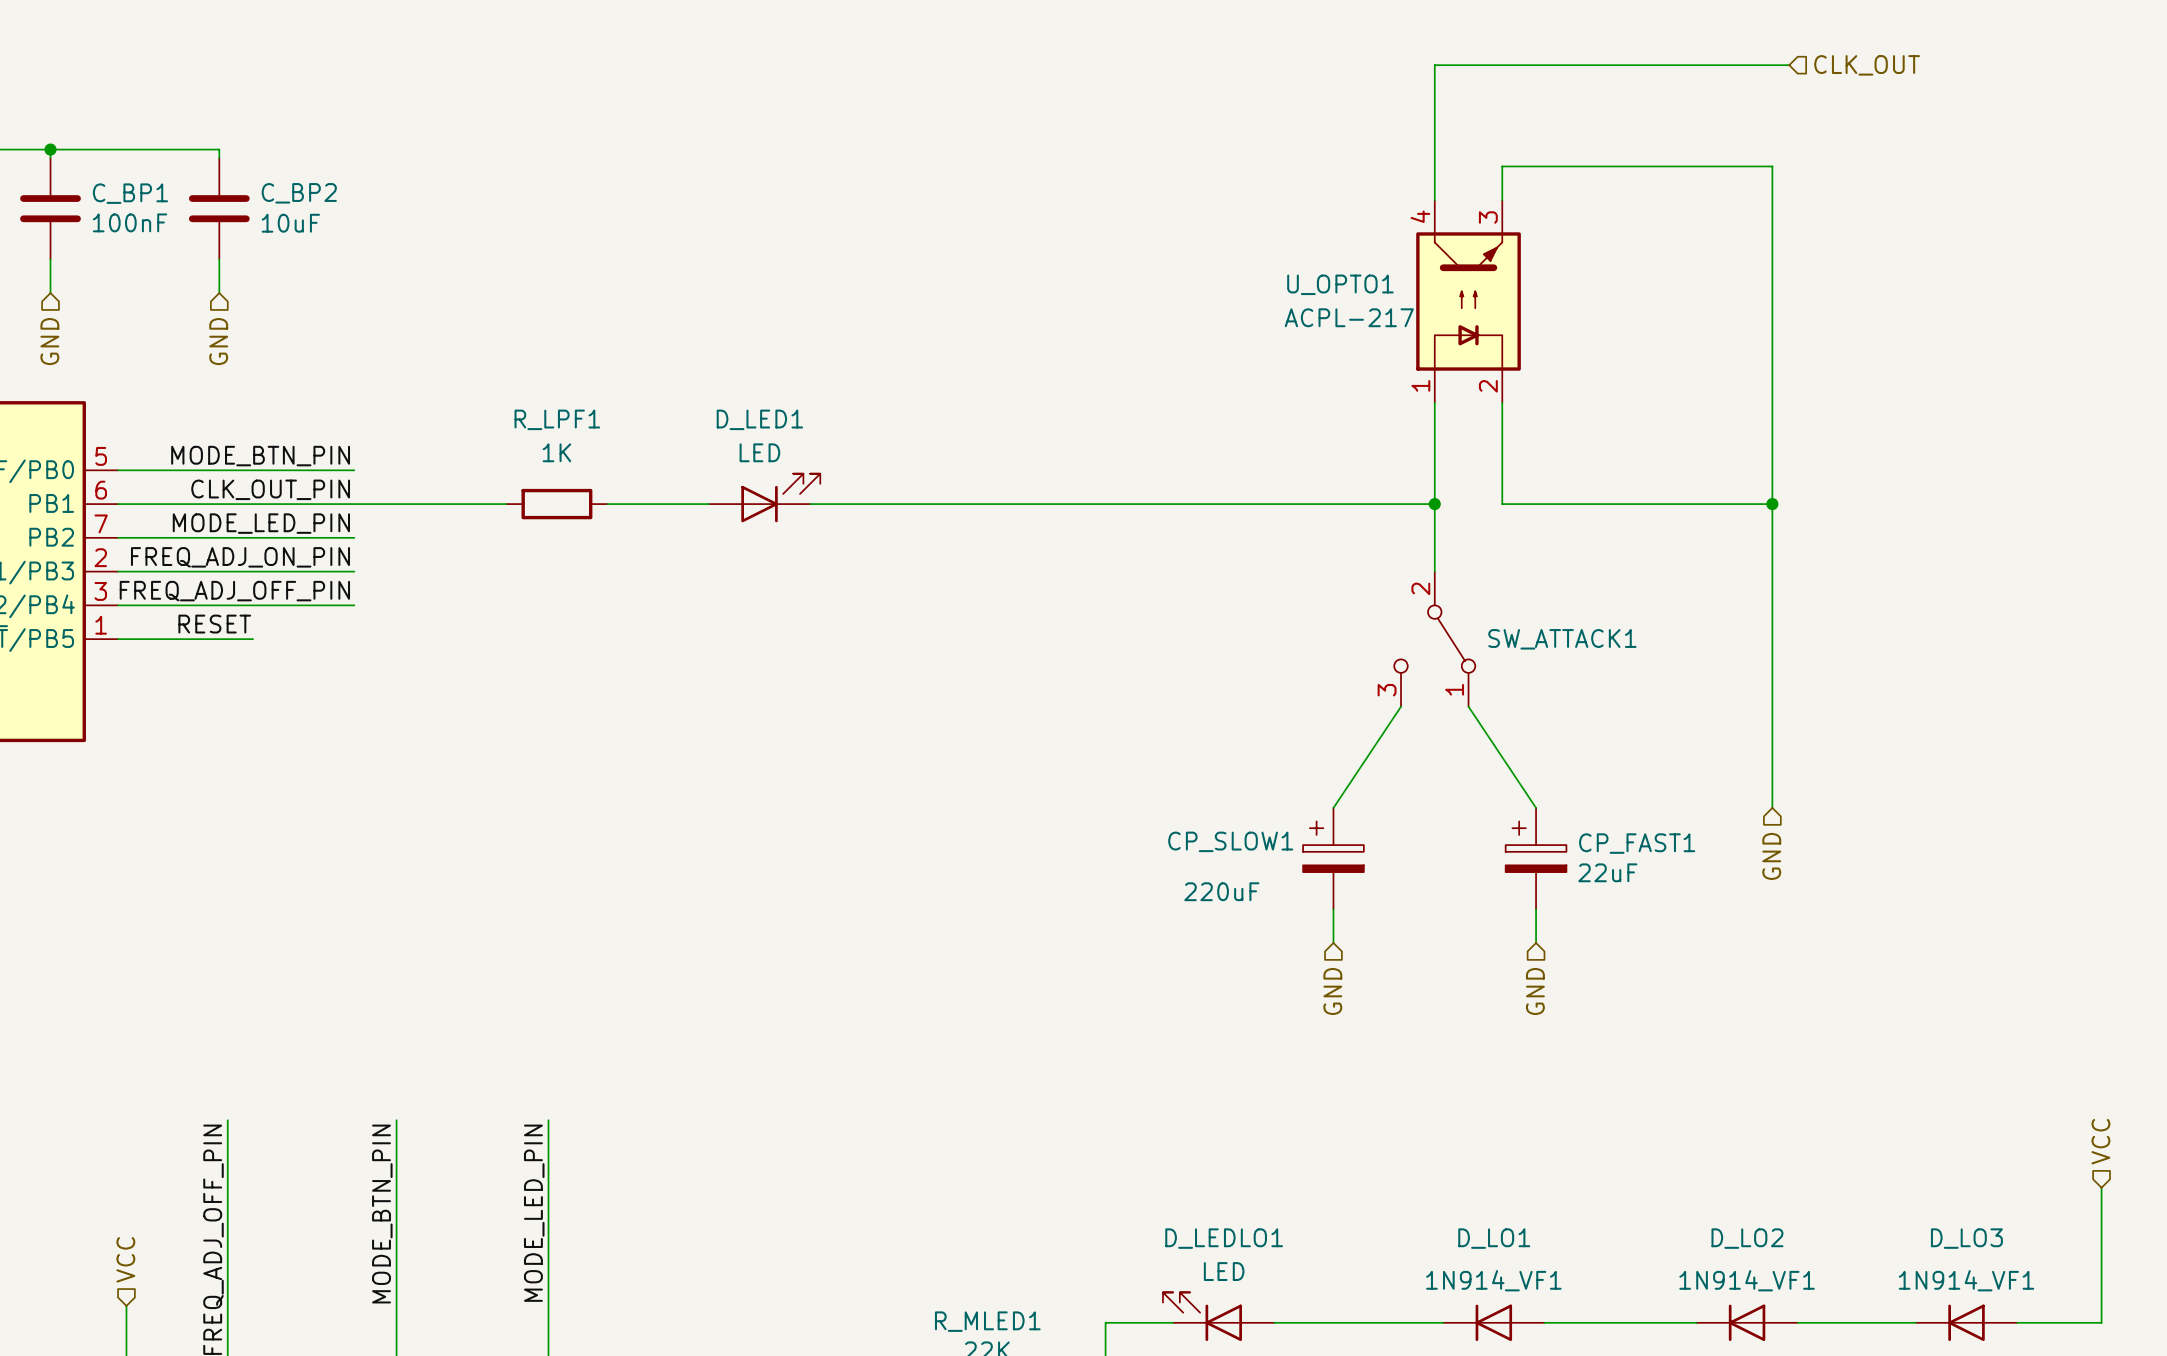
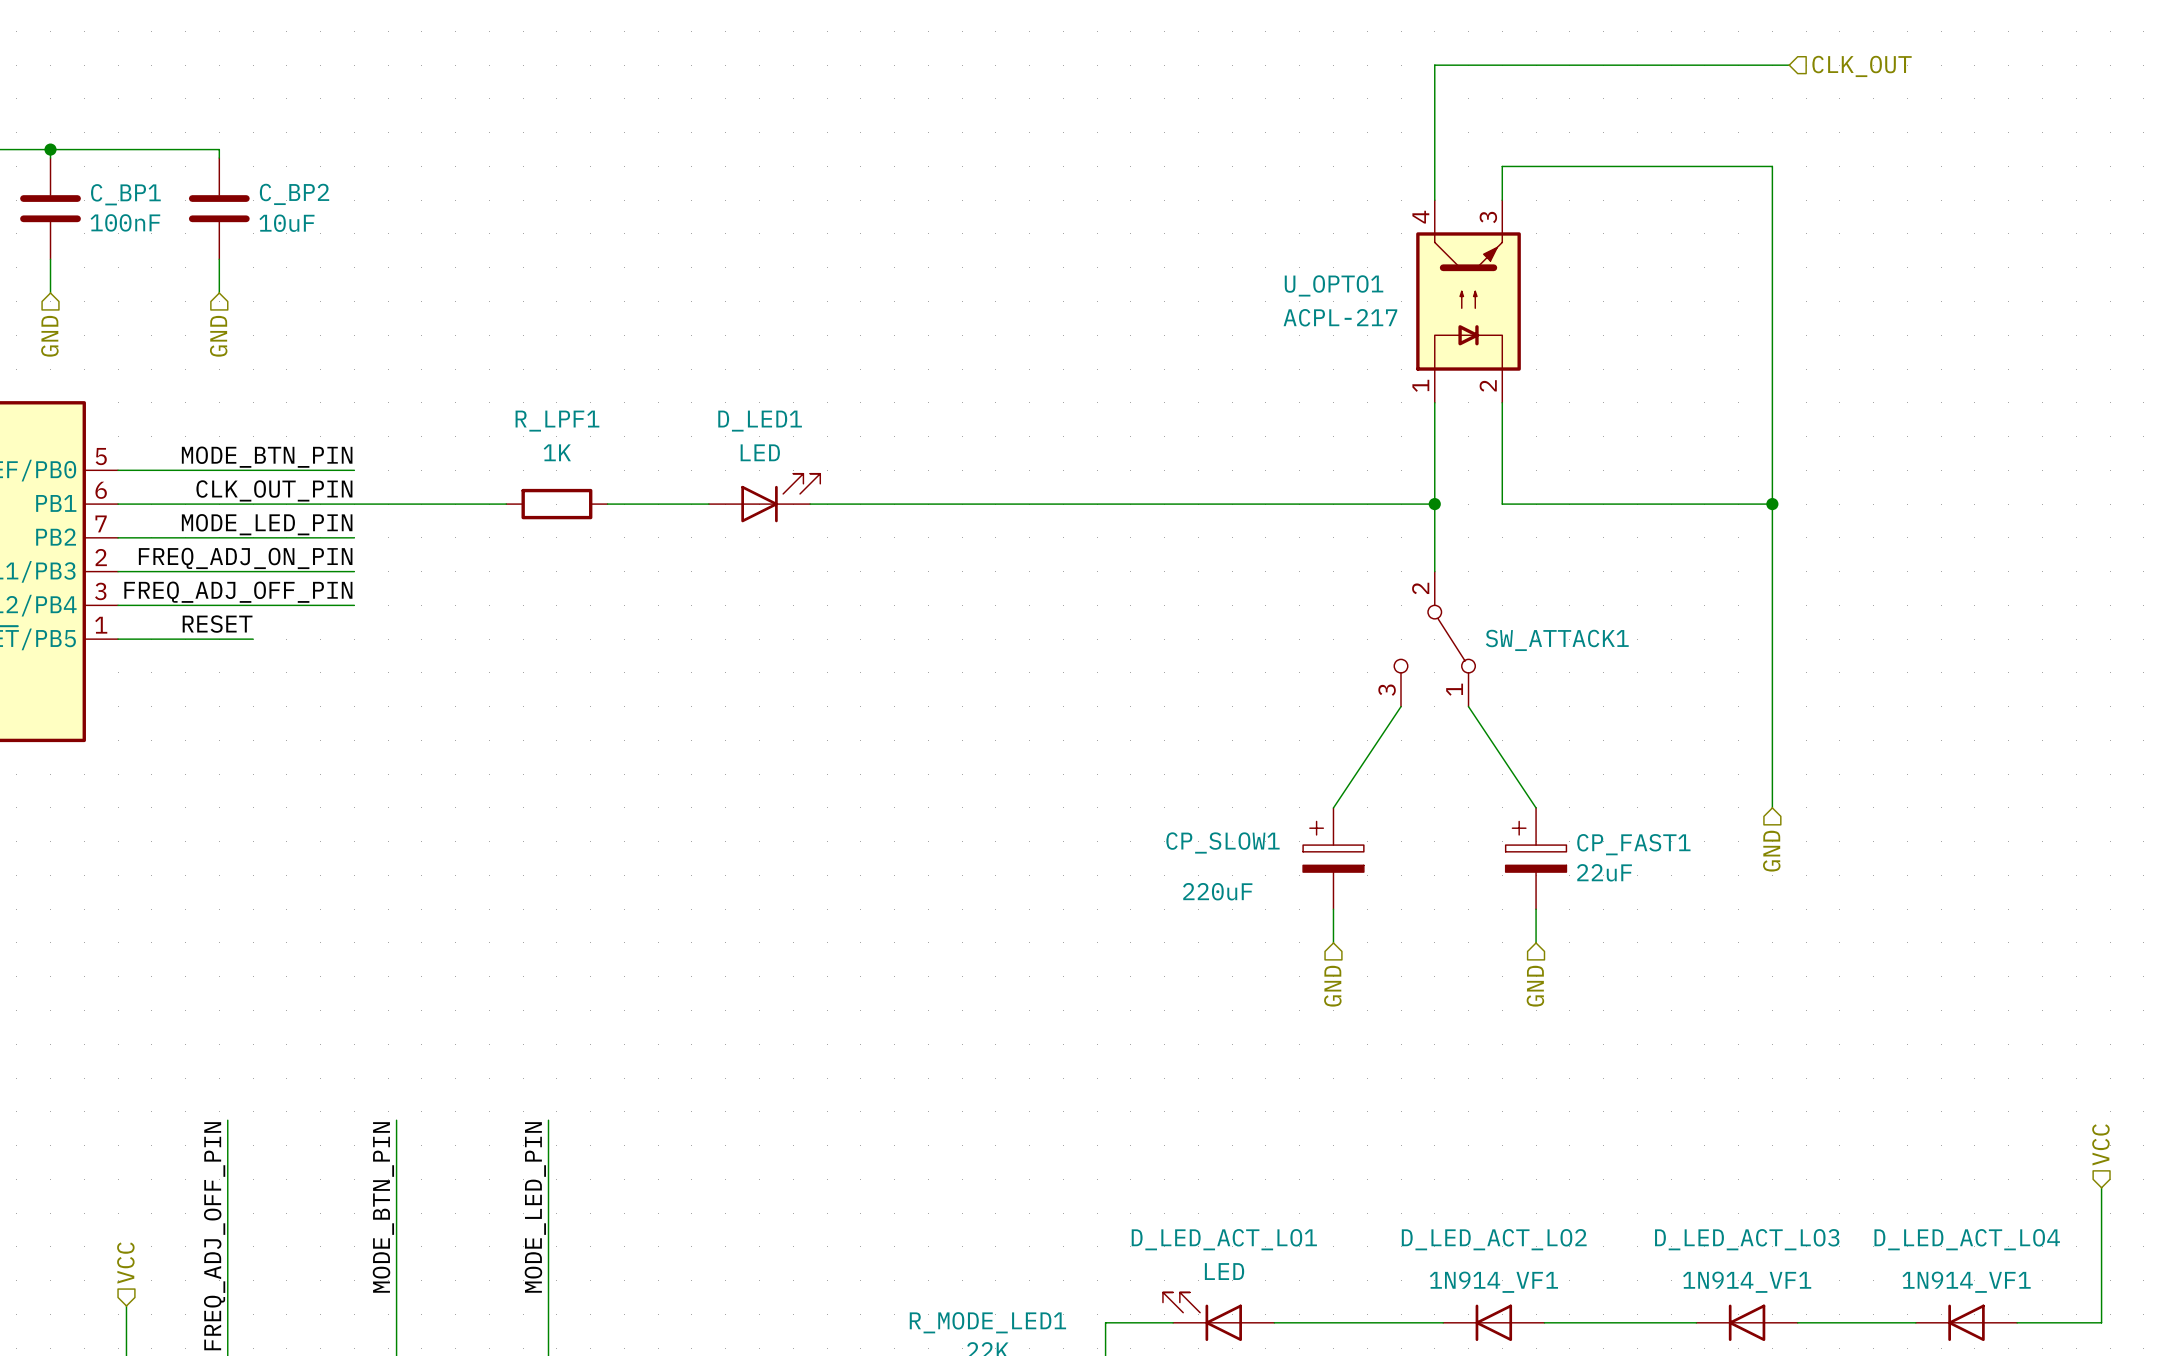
D_LEDLO1 name: D_LEDLO1 (1224, 1238) -> D_LED_ACT_LO1 (1224, 1239)
D_LO1 name: D_LO1 (1494, 1238) -> D_LED_ACT_LO2 (1494, 1239)
D_LO2 name: D_LO2 (1747, 1238) -> D_LED_ACT_LO3 (1747, 1239)
D_LO3 name: D_LO3 (1966, 1238) -> D_LED_ACT_LO4 (1967, 1239)
R_MLED1 name: R_MLED1 (987, 1321) -> R_MODE_LED1 (987, 1322)

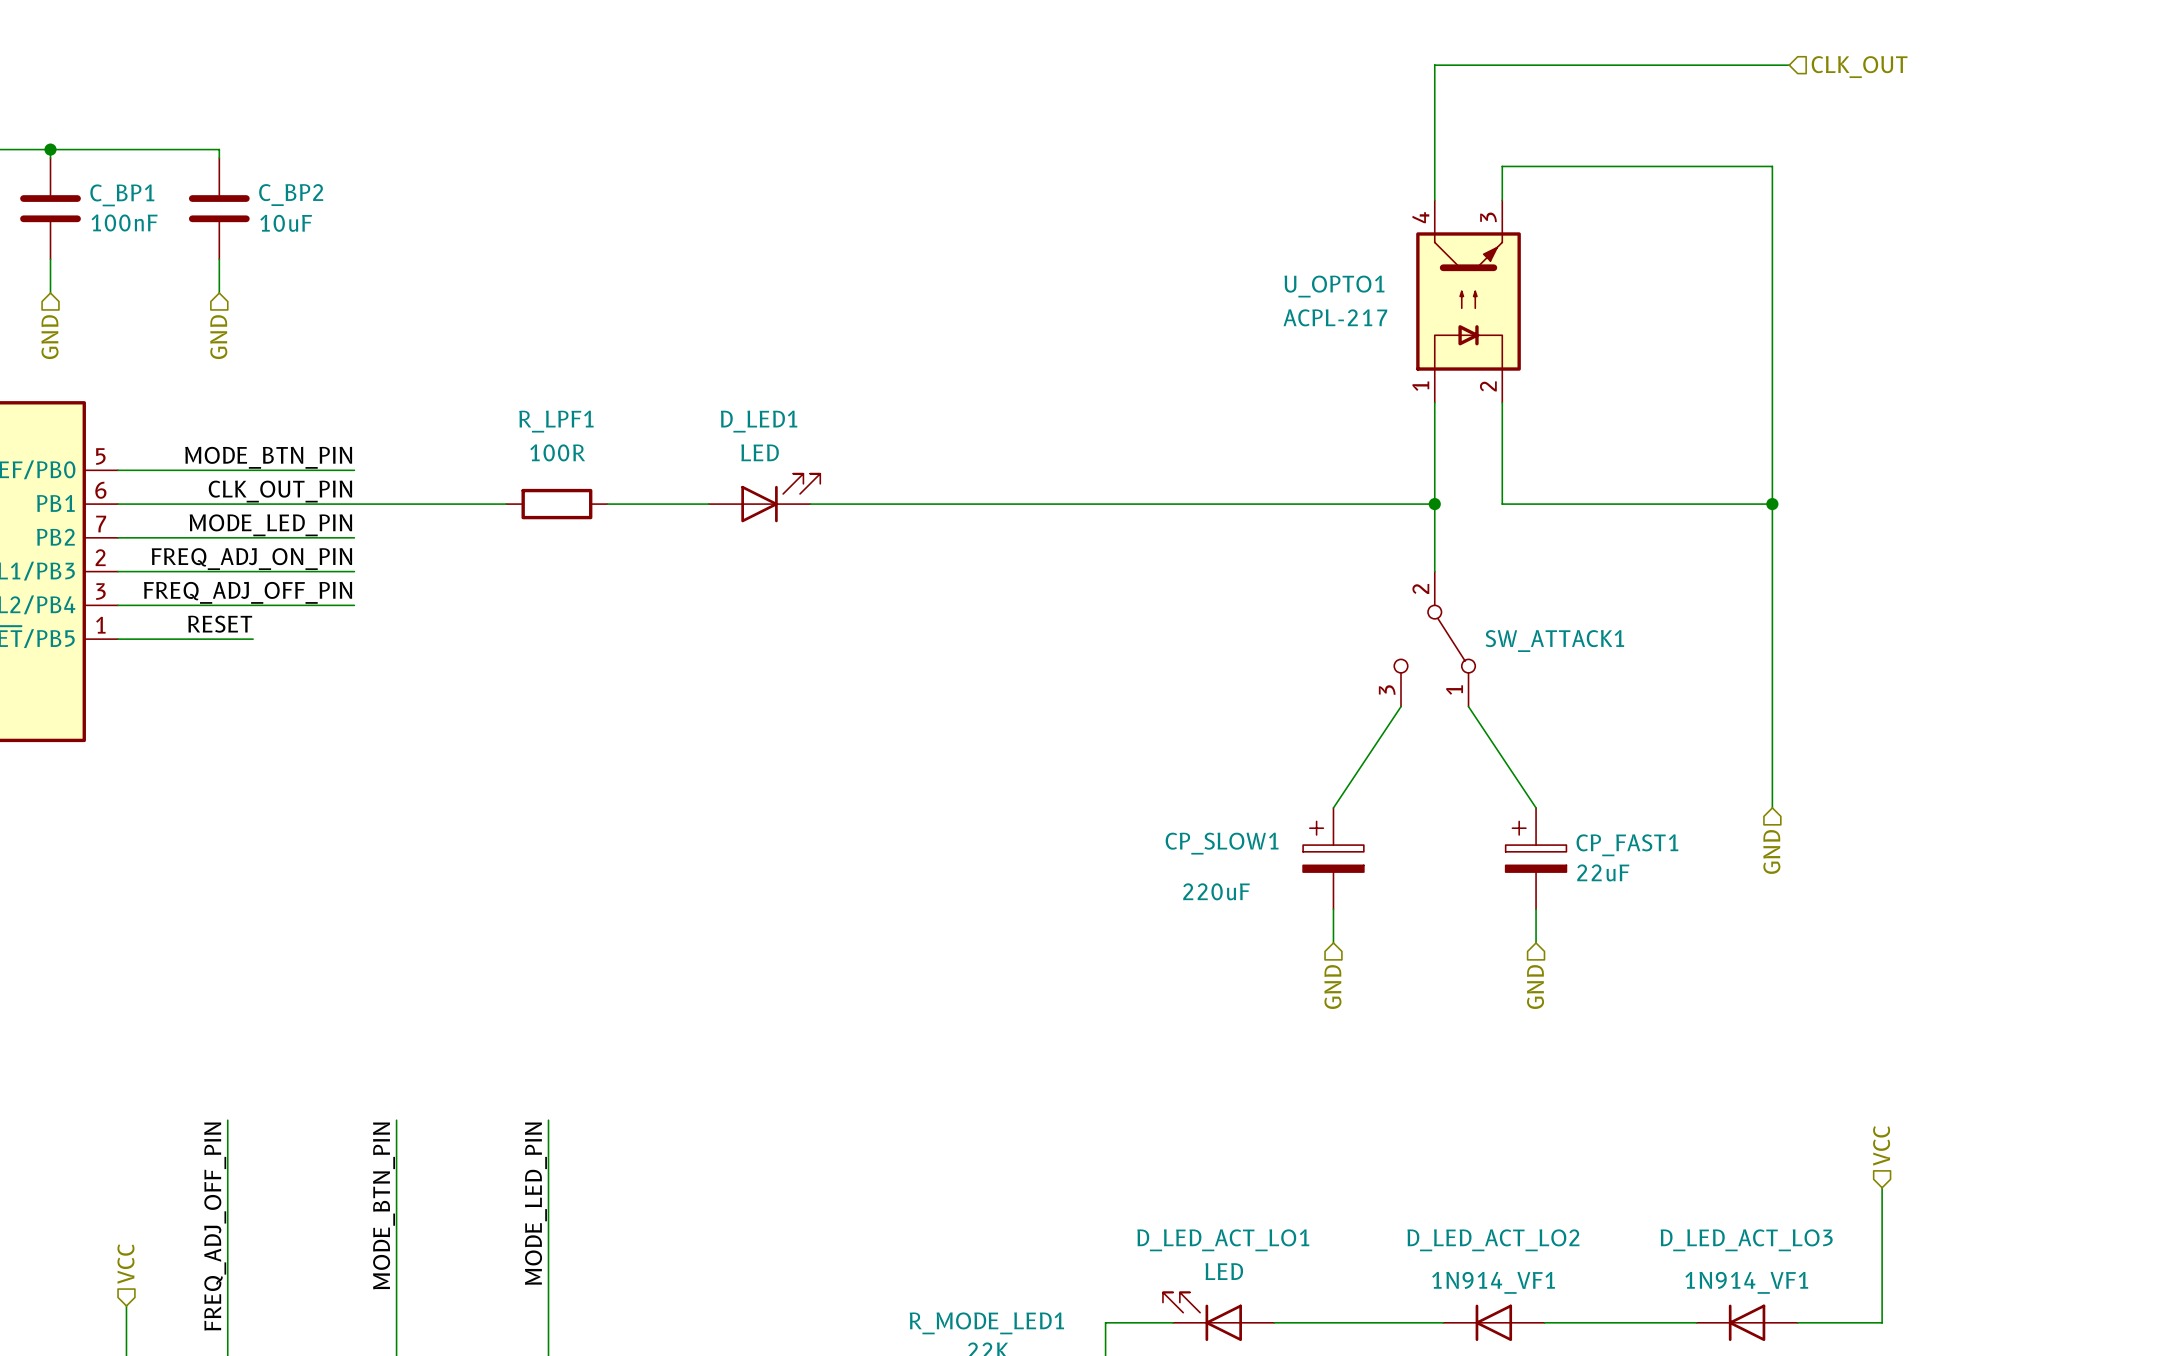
R_LPF1 value: 1K (557, 452) -> 100R (557, 452)
hierarchical label position: VCC (2100, 1144) -> VCC (1881, 1145)
wire: (2101, 1187) (2101, 1322) (2017, 1322) -> none
wire: (1882, 1322) (1915, 1322) -> (1882, 1322) (1882, 1187)
D_LED_ACT_LO4: 1N914_VF1 (1966, 1322) -> none

